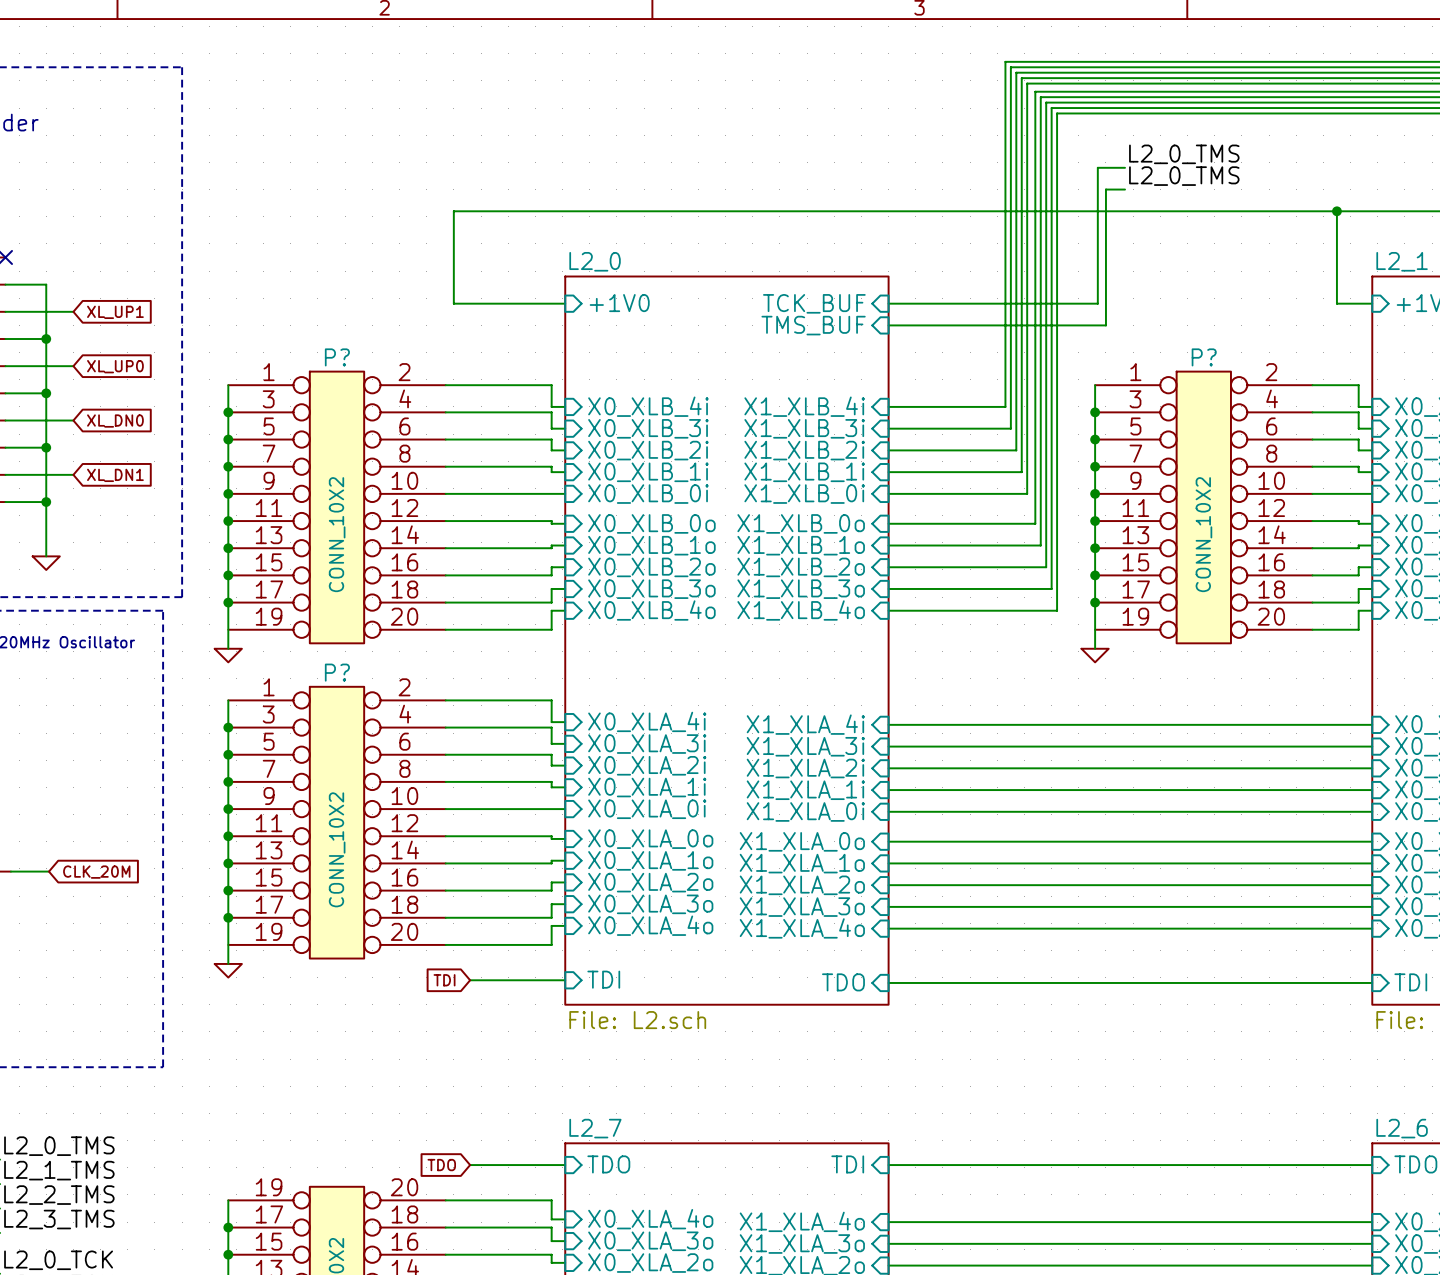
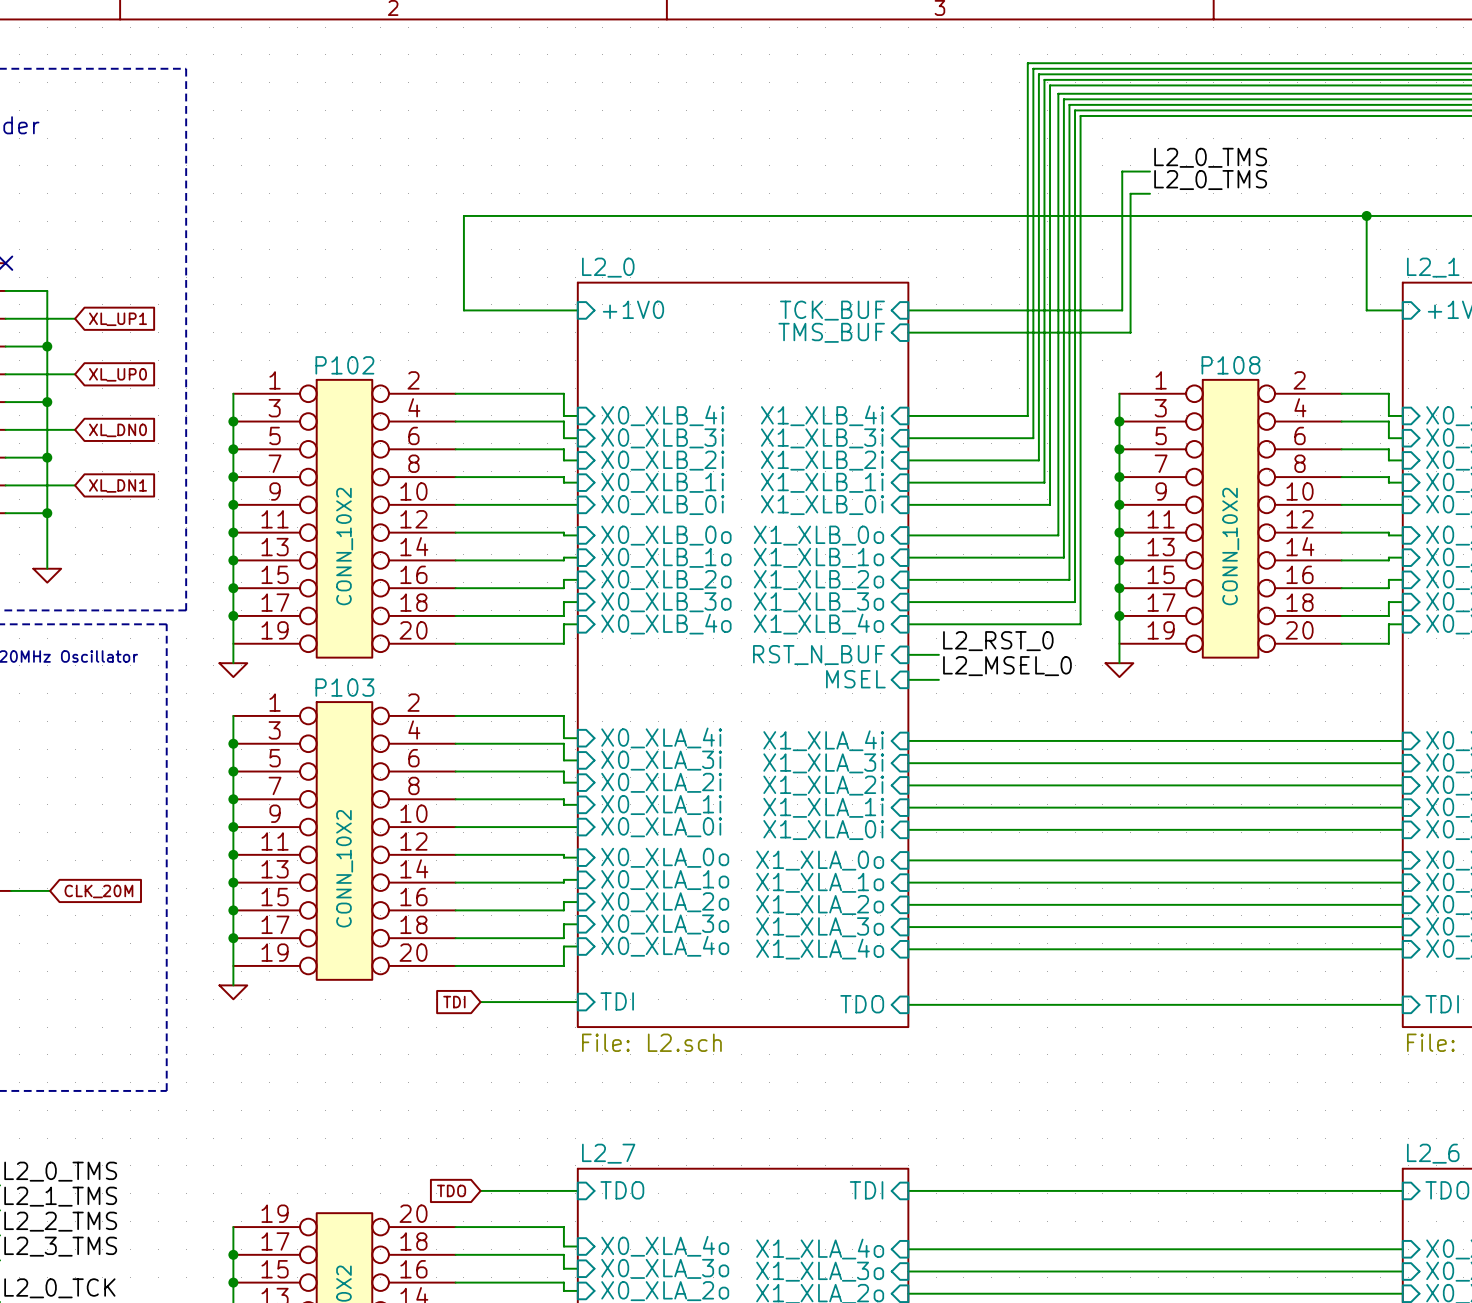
P? name: P? (337, 357) -> P102 (344, 365)
P? name: P? (1204, 357) -> P108 (1230, 365)
label: none -> L2_RST_0 (998, 641)
sheet pin: none -> RST_N_BUF (818, 655)
wire: none -> (908, 654) (938, 654)
label: none -> L2_MSEL_0 (1007, 666)
sheet pin: none -> MSEL (855, 679)
wire: none -> (908, 679) (938, 679)
P? name: P? (337, 672) -> P103 (344, 687)

